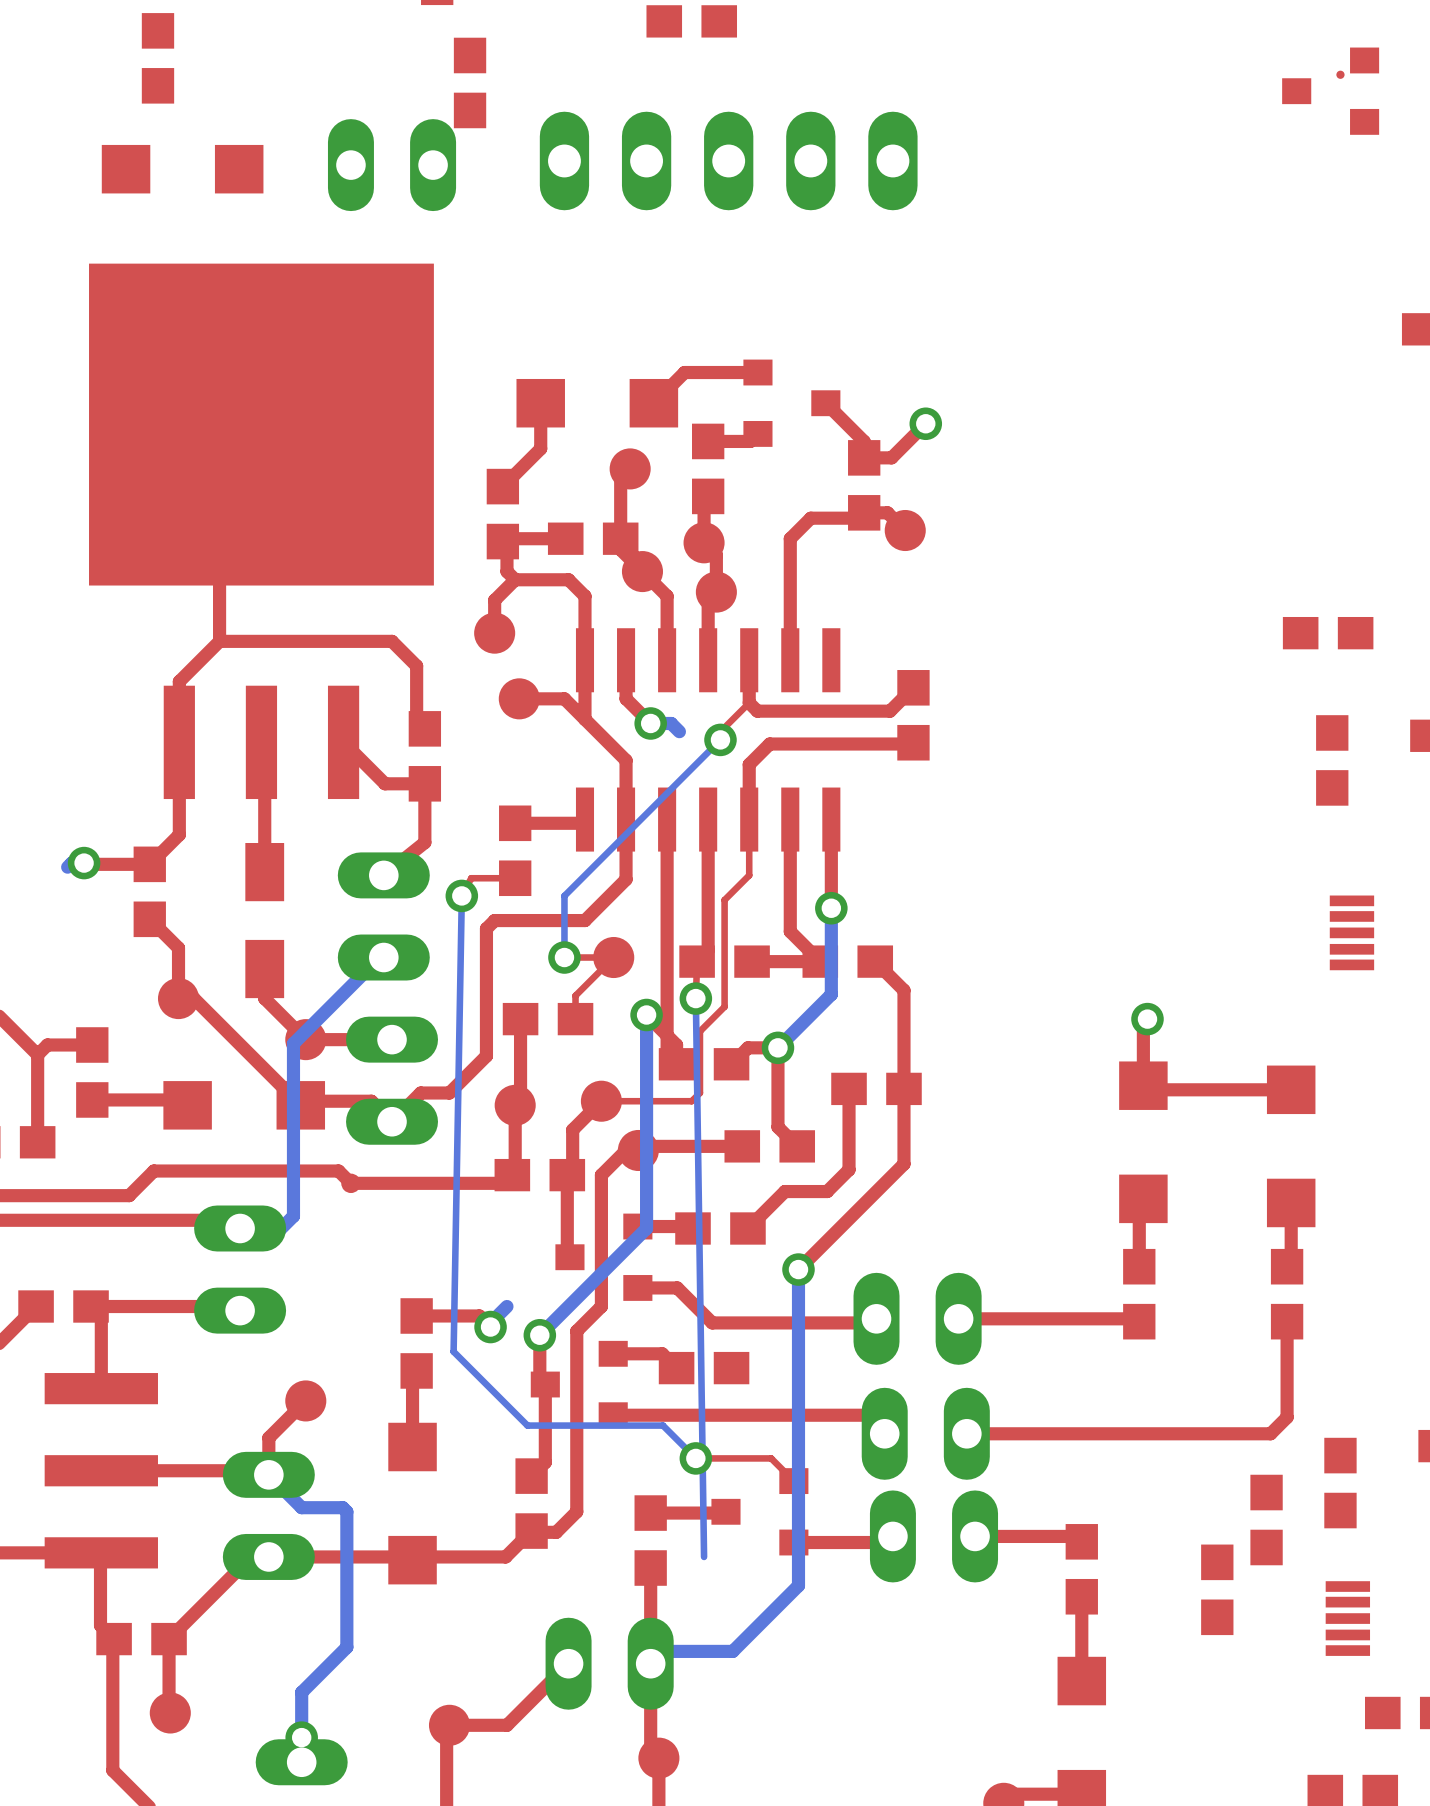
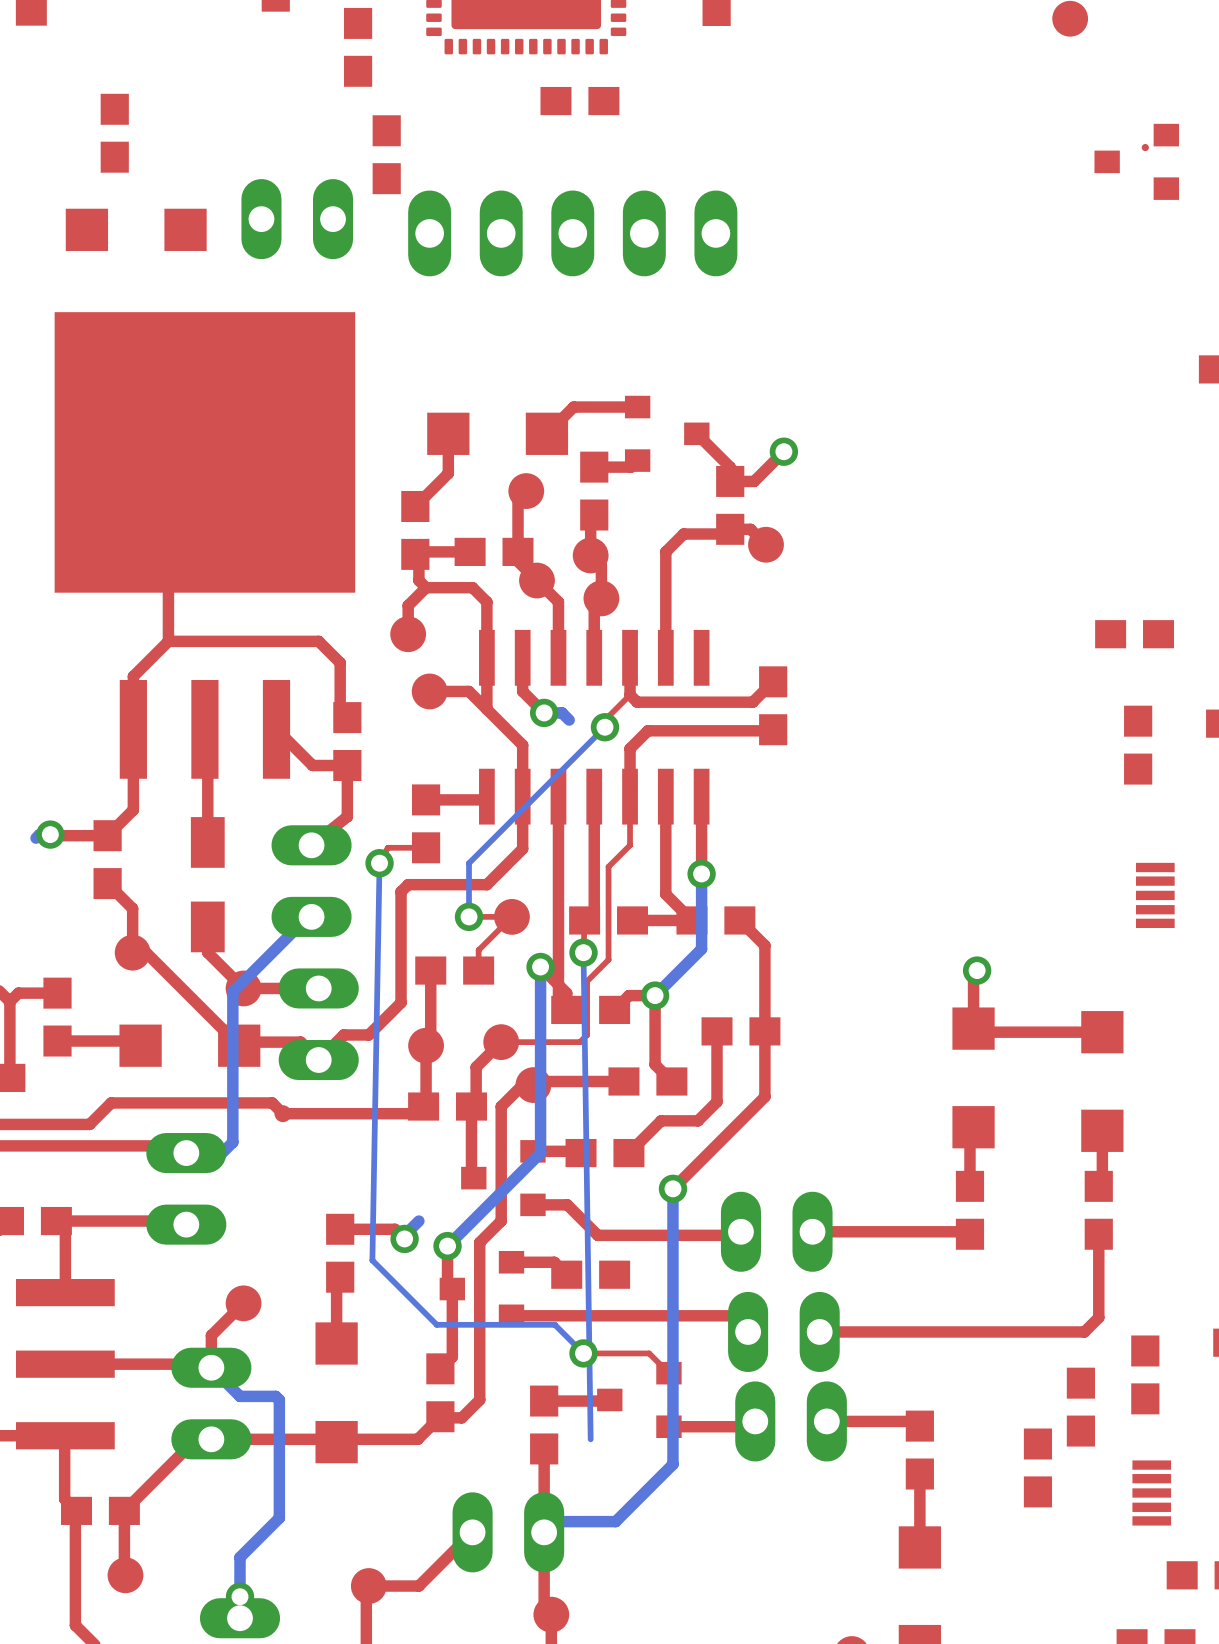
part position: (728, 160) -> (572, 233)
part position: (392, 165) -> (297, 219)

